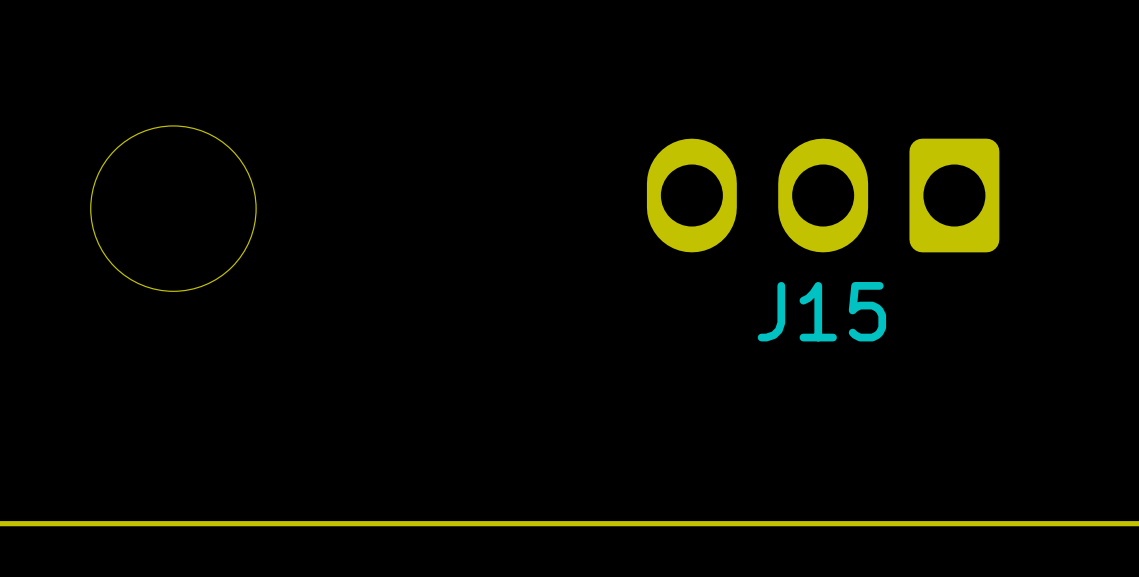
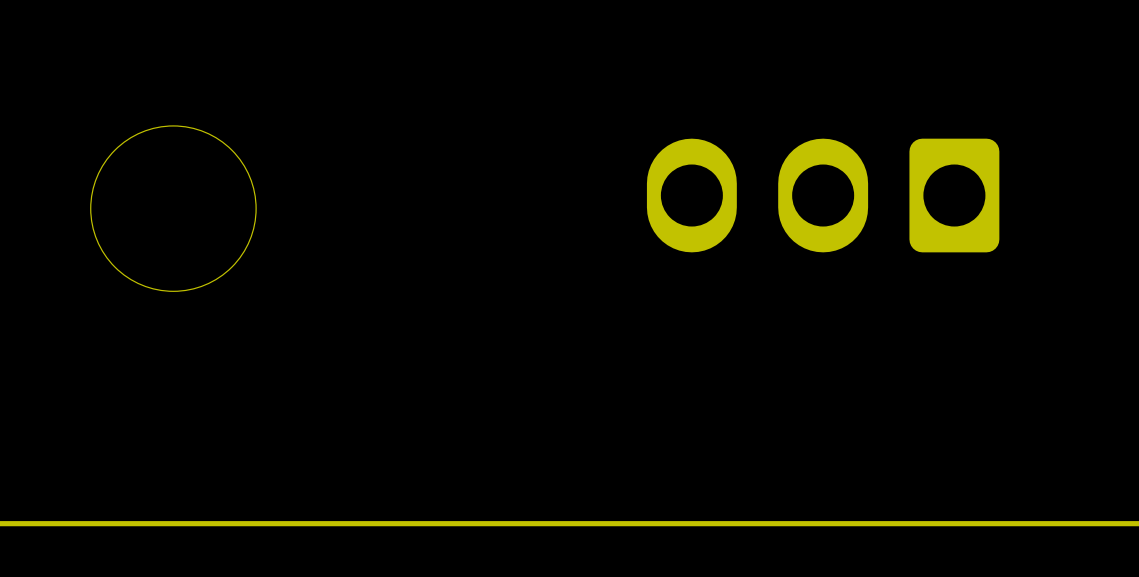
J15 name: J15 (821, 311) -> none

